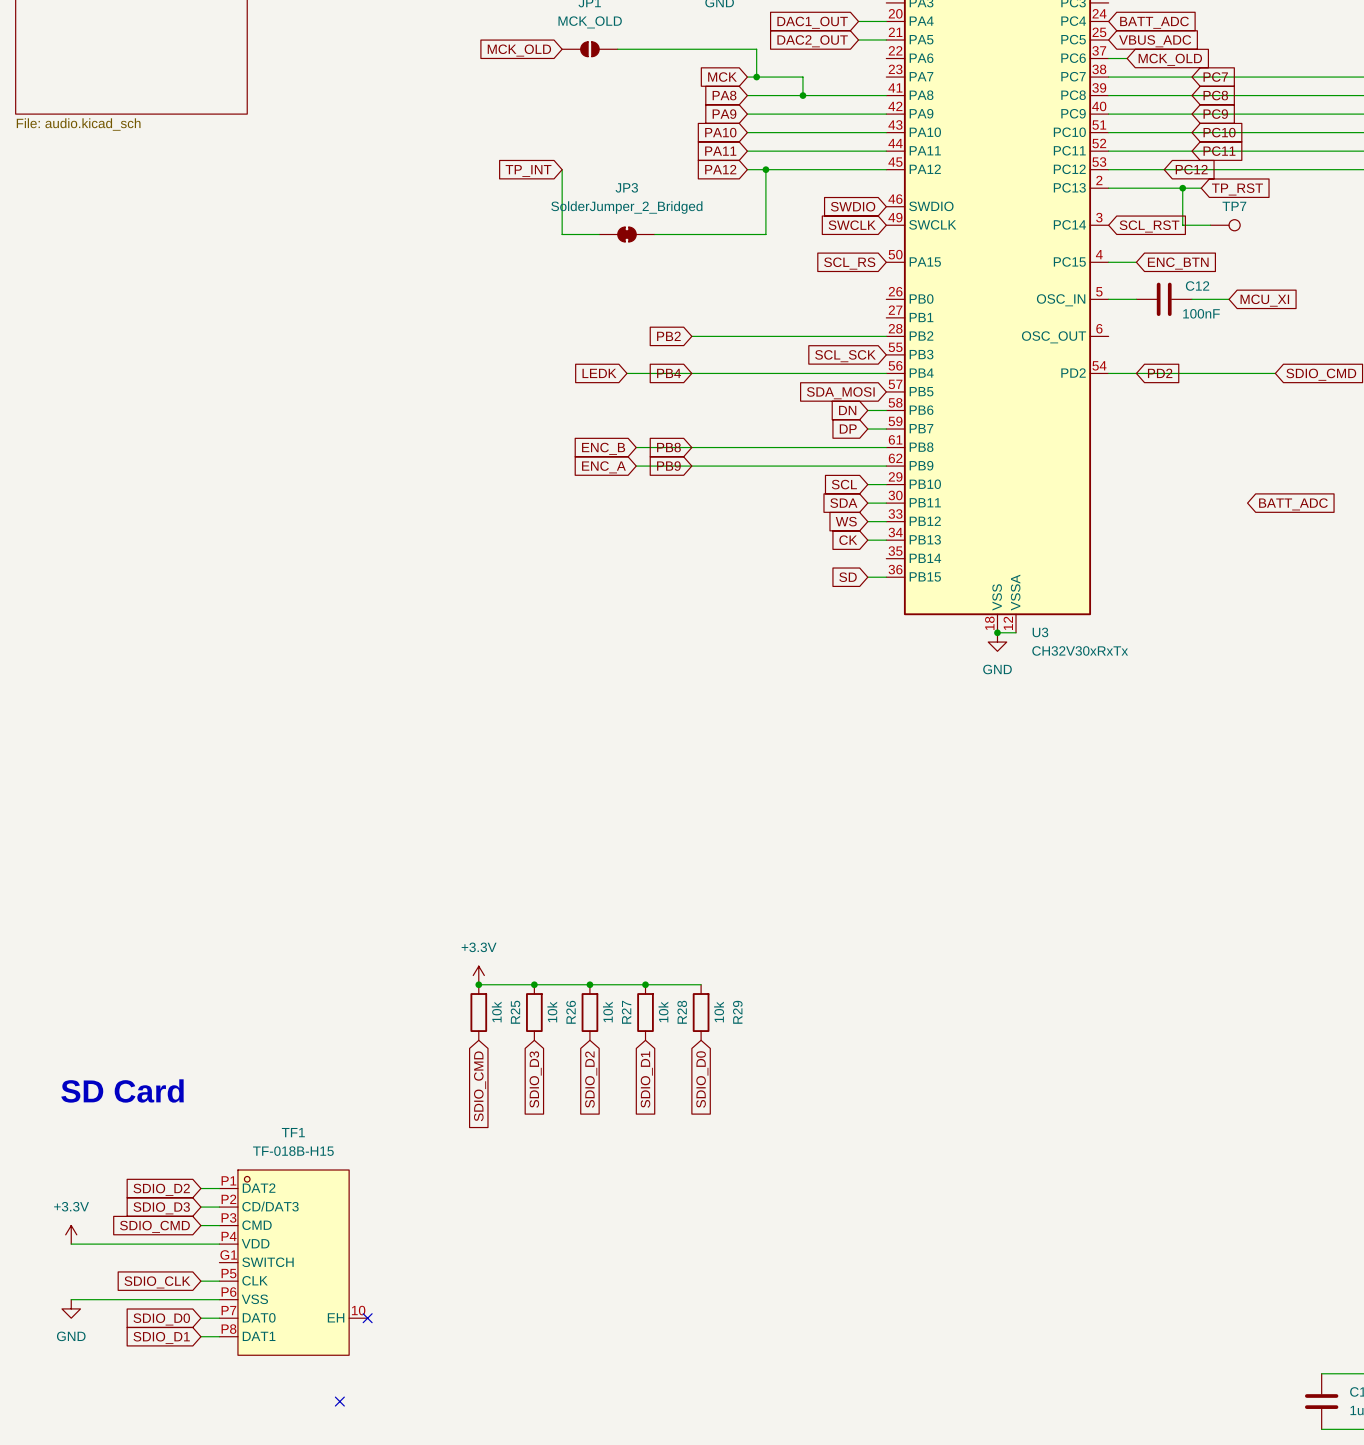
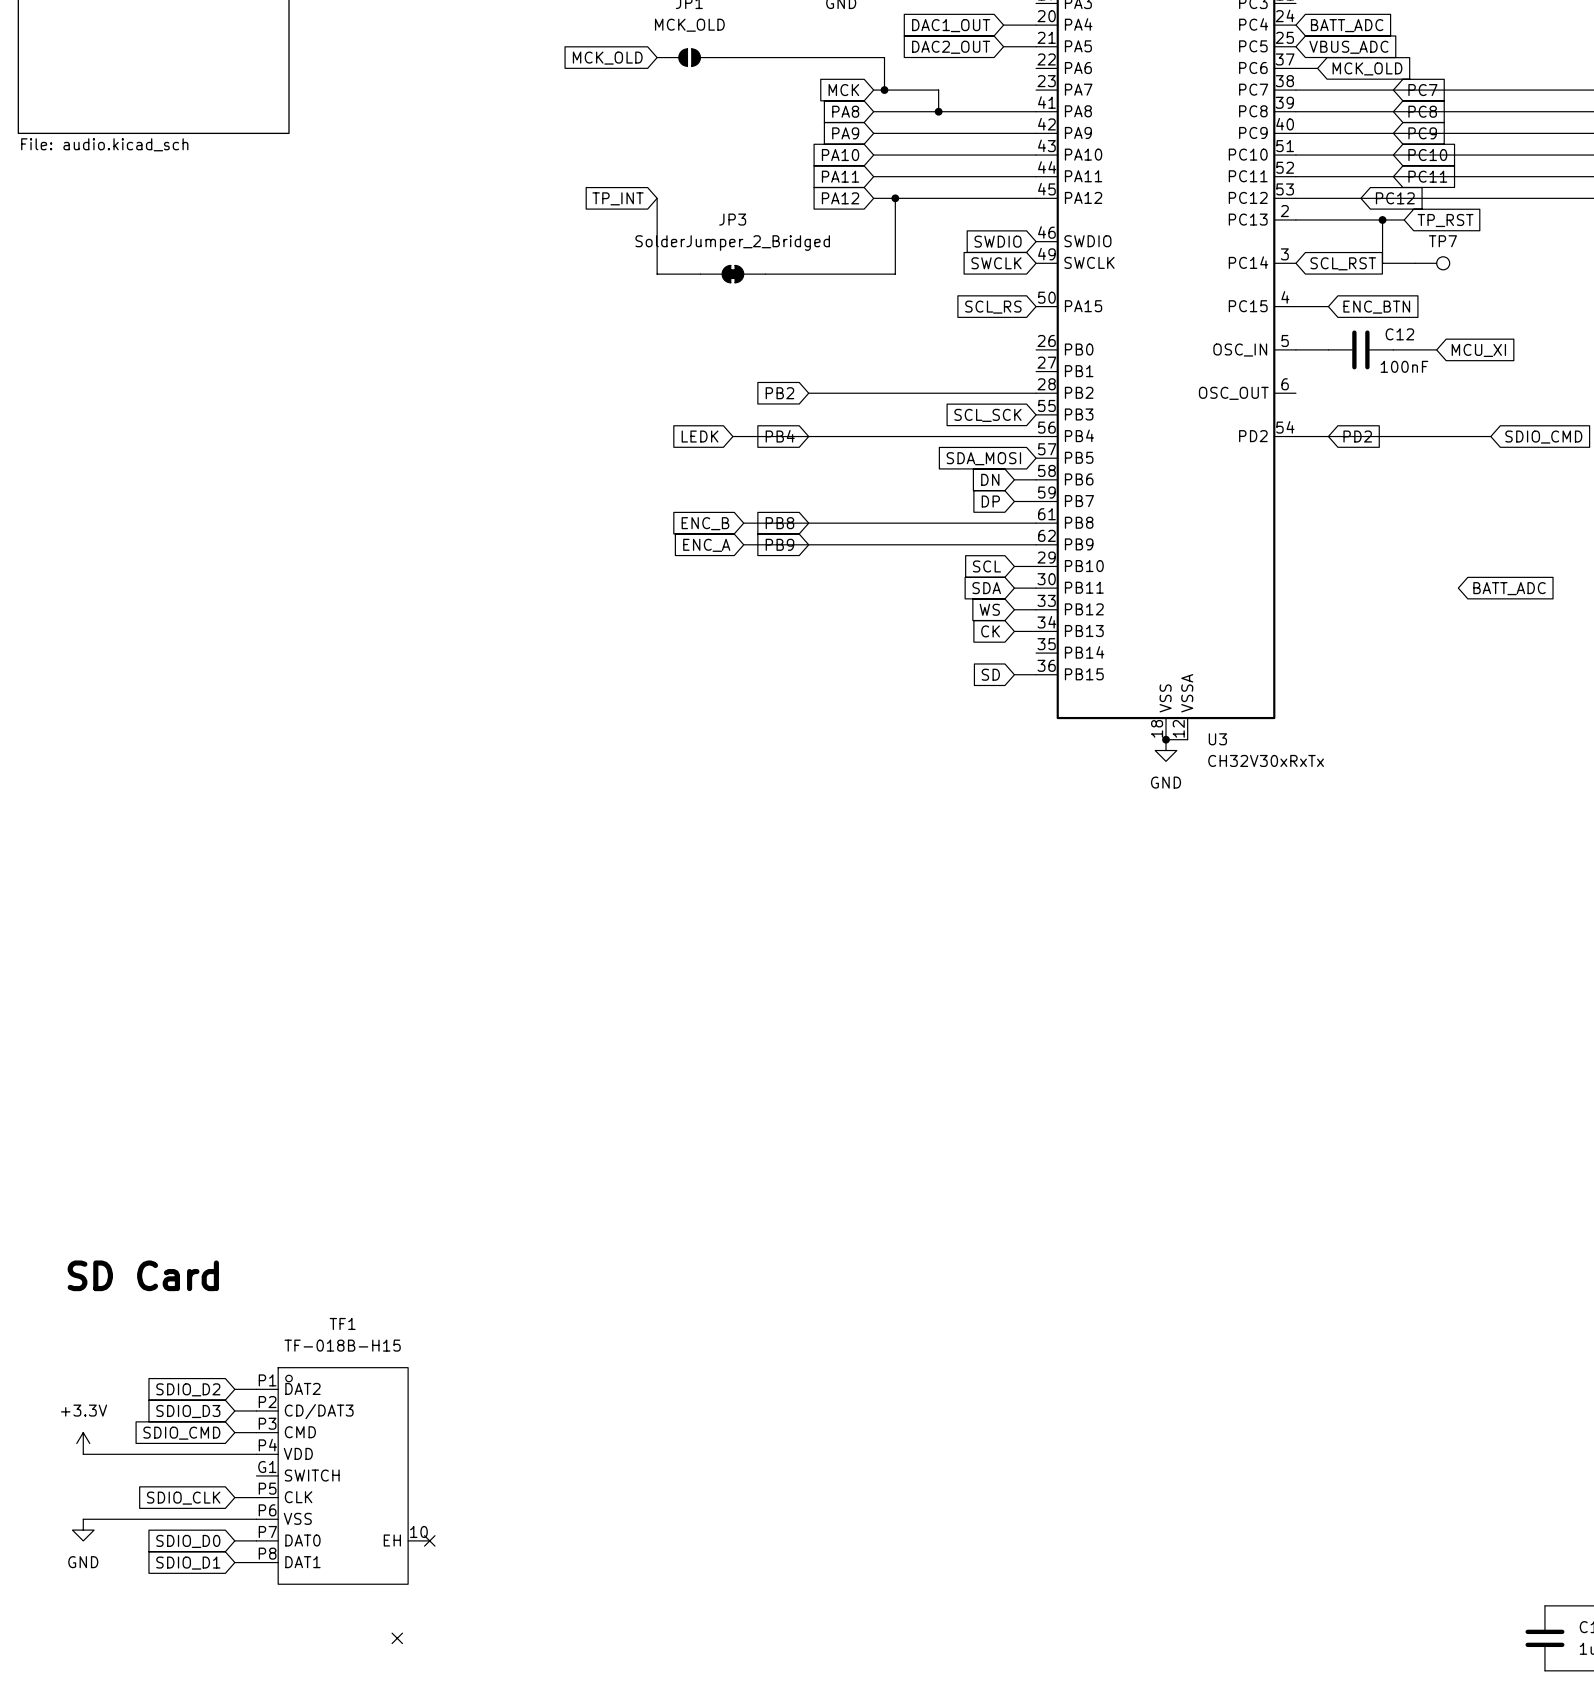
power symbol: +3.3V (478, 975) -> none
wire: (478, 984) (701, 984) -> none
junction: (478, 984) -> none
junction: (534, 984) -> none
junction: (589, 984) -> none
junction: (645, 984) -> none
R25: 10k (478, 1012) -> none
R26: 10k (534, 1012) -> none
R27: 10k (589, 1012) -> none
R28: 10k (645, 1012) -> none
R29: 10k (701, 1012) -> none
global label: SDIO_D3 (535, 1079) -> none
global label: SDIO_D2 (591, 1079) -> none
global label: SDIO_D1 (646, 1079) -> none
global label: SDIO_D0 (702, 1079) -> none
global label: SDIO_CMD (480, 1086) -> none

